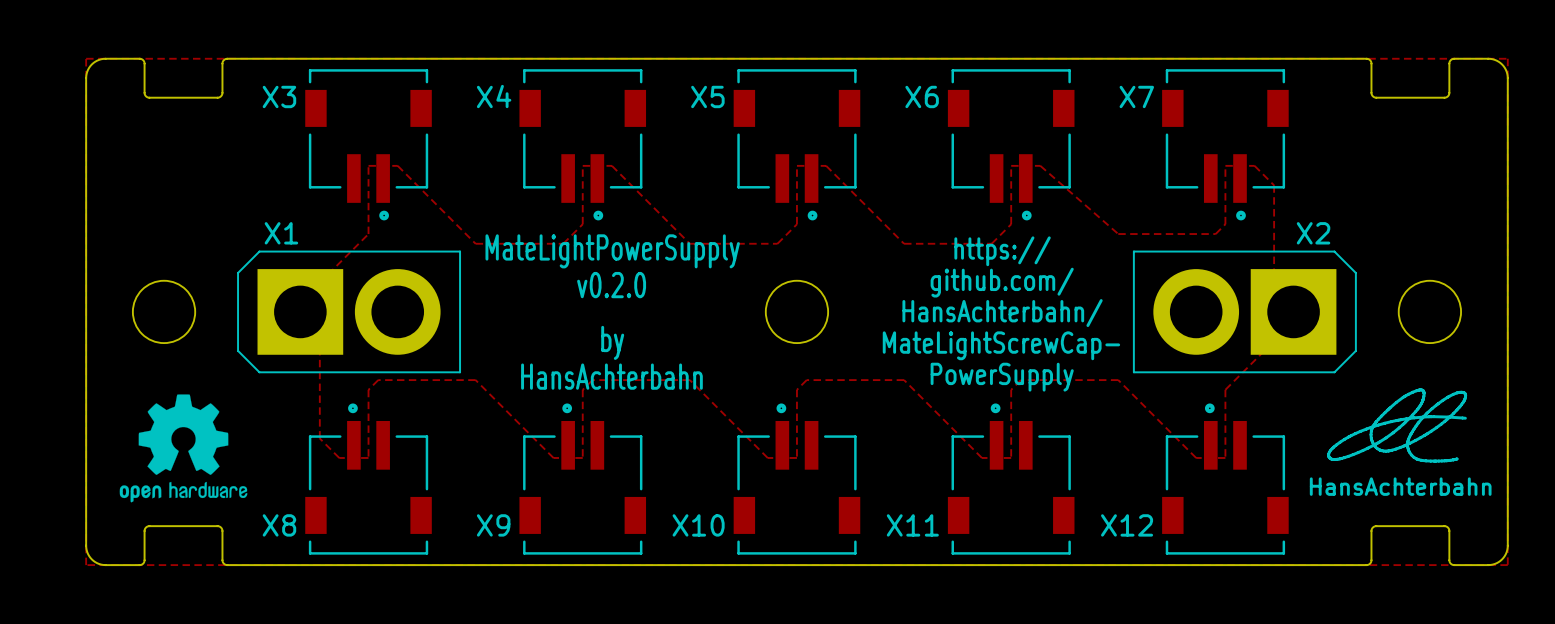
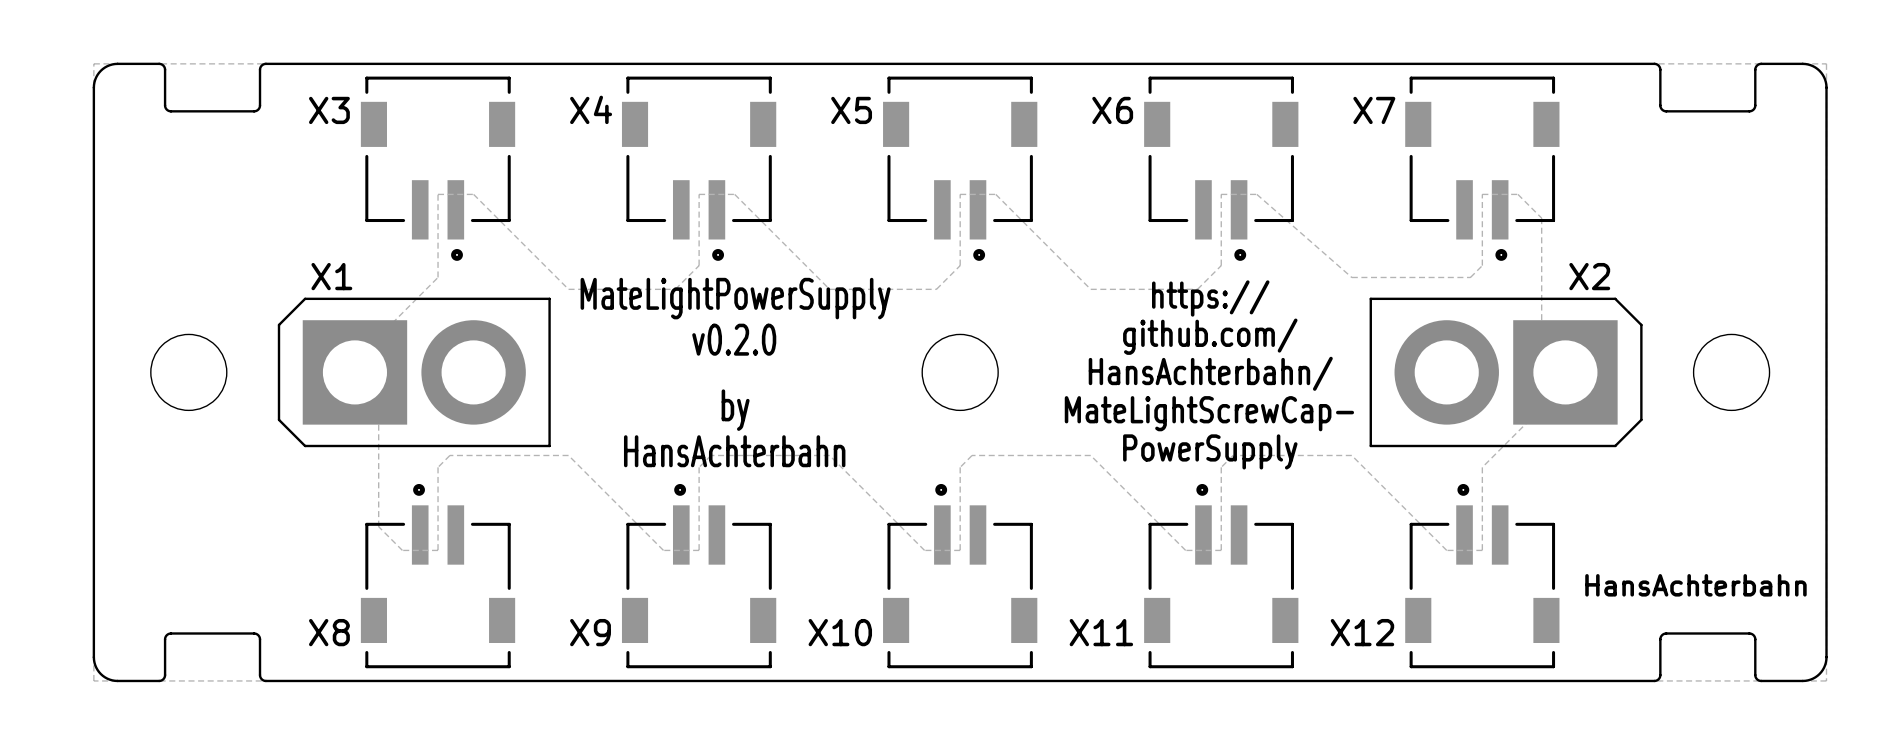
drawing: [1327, 388, 1468, 463] -> none
drawing: [119, 394, 248, 503] -> none

